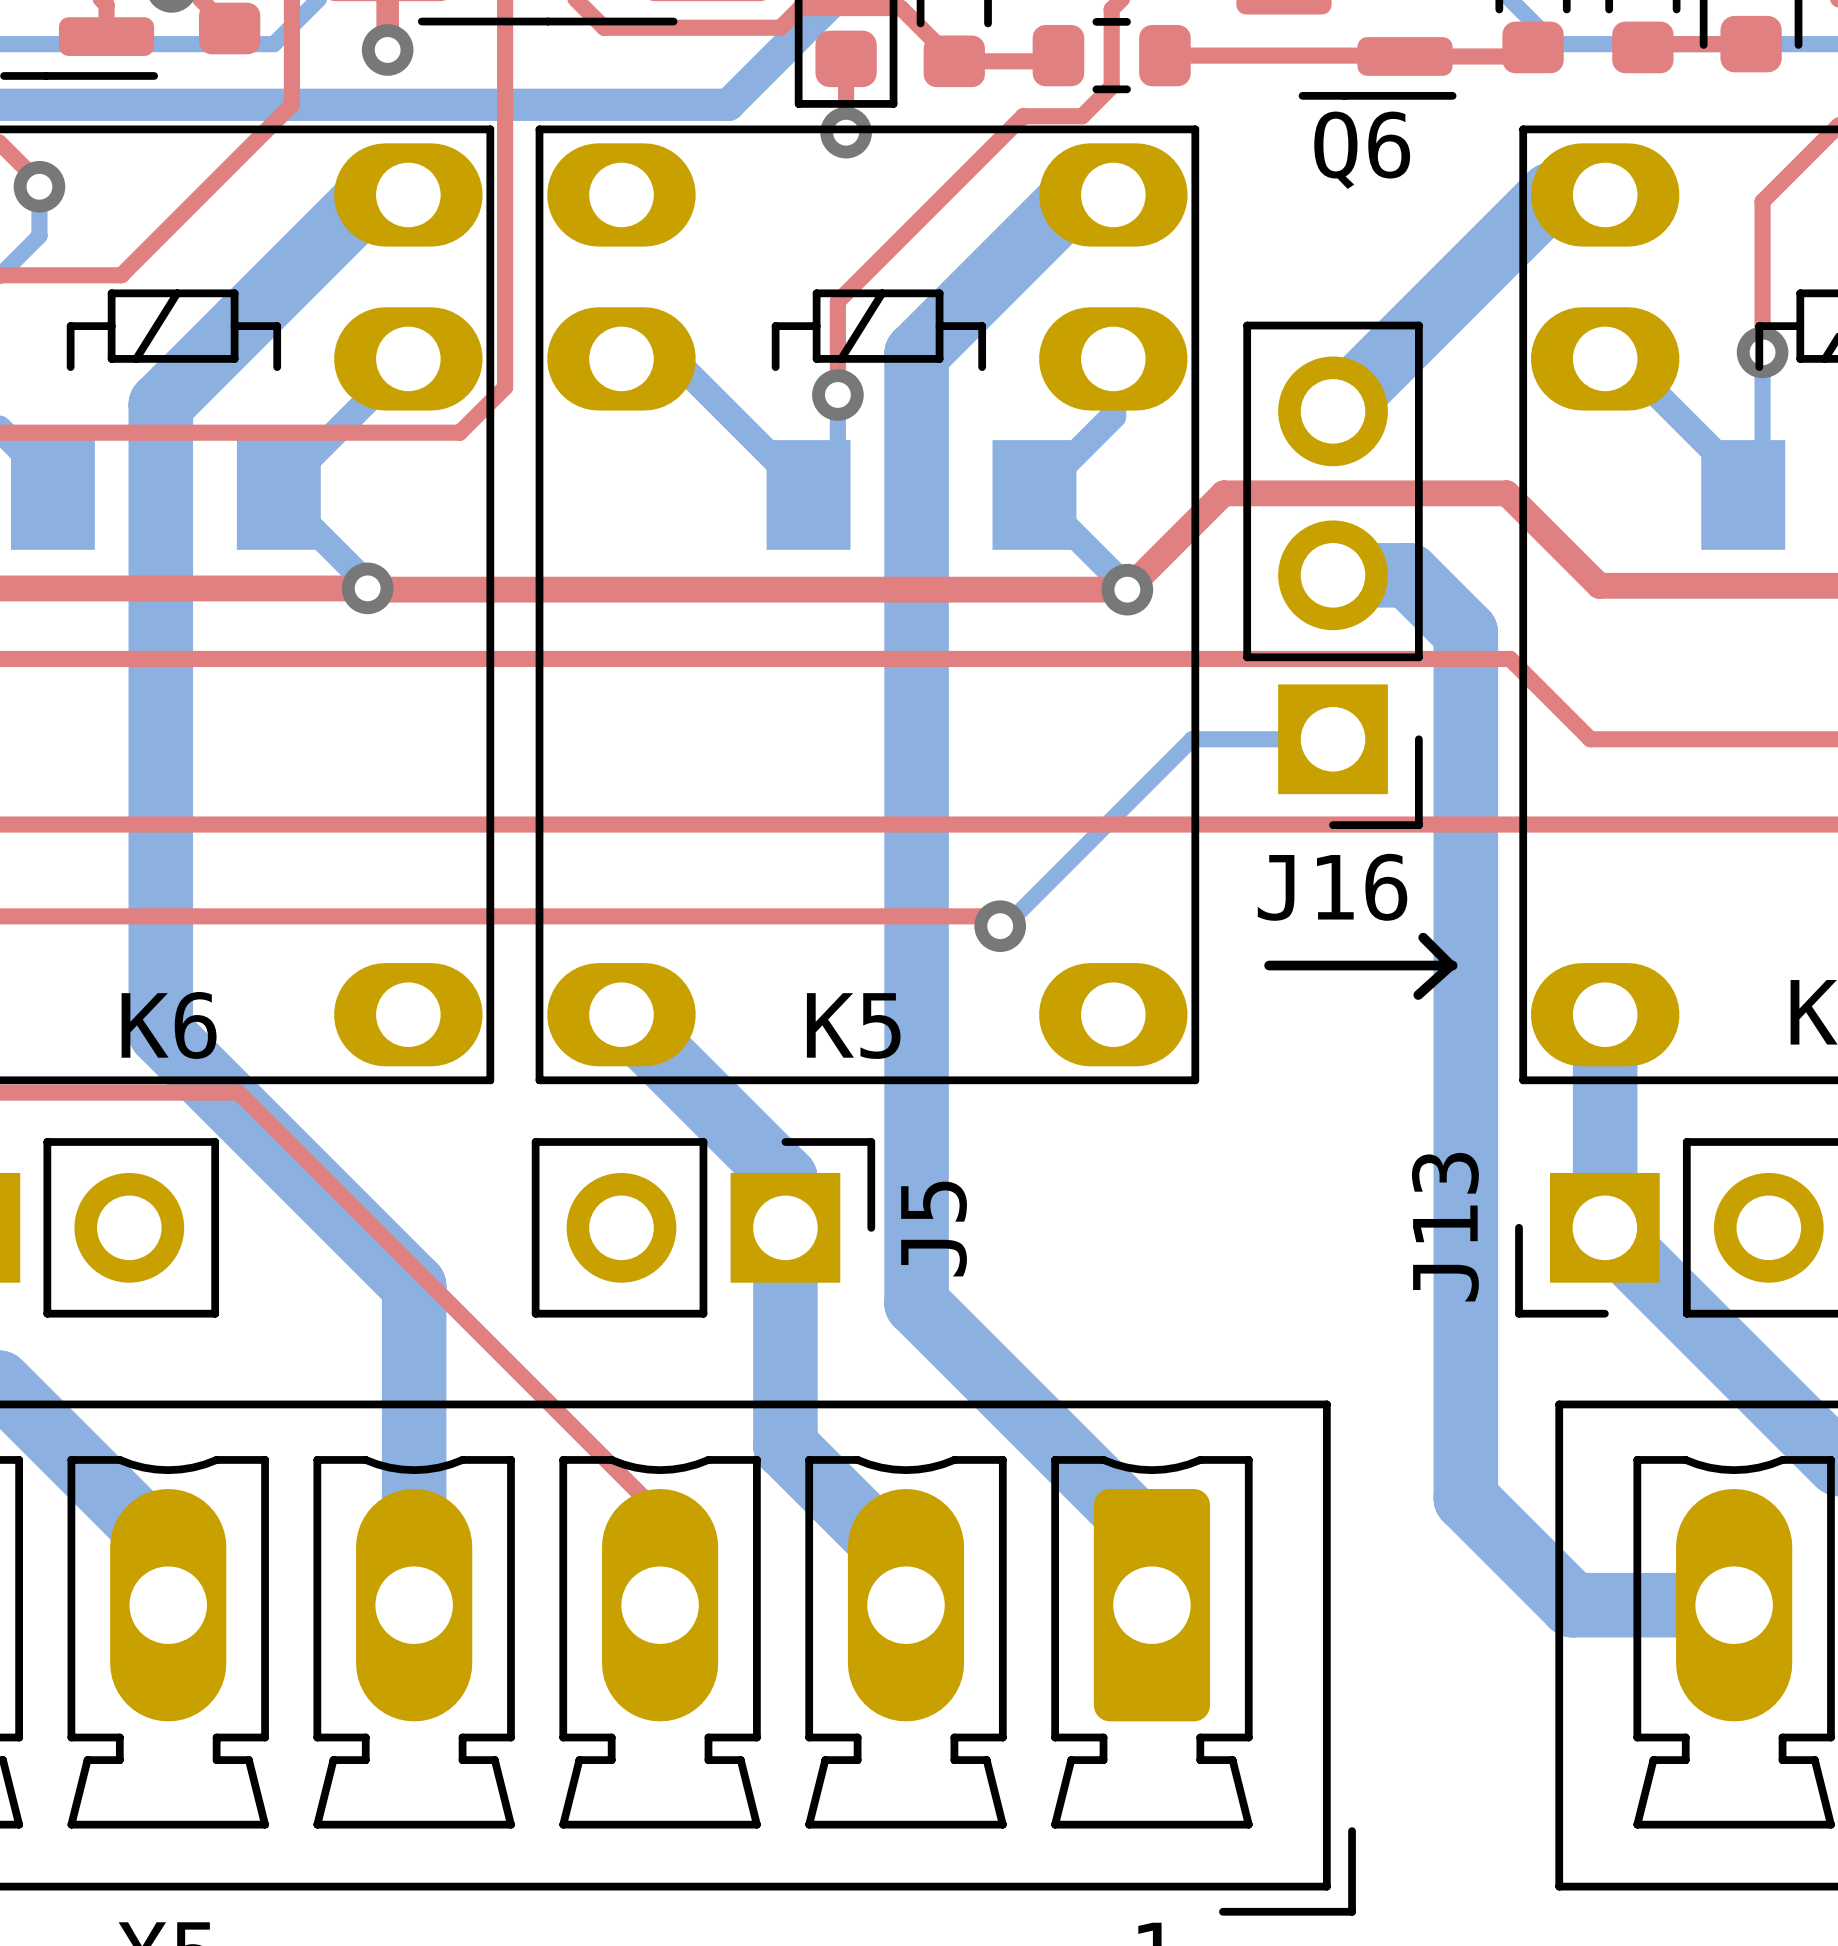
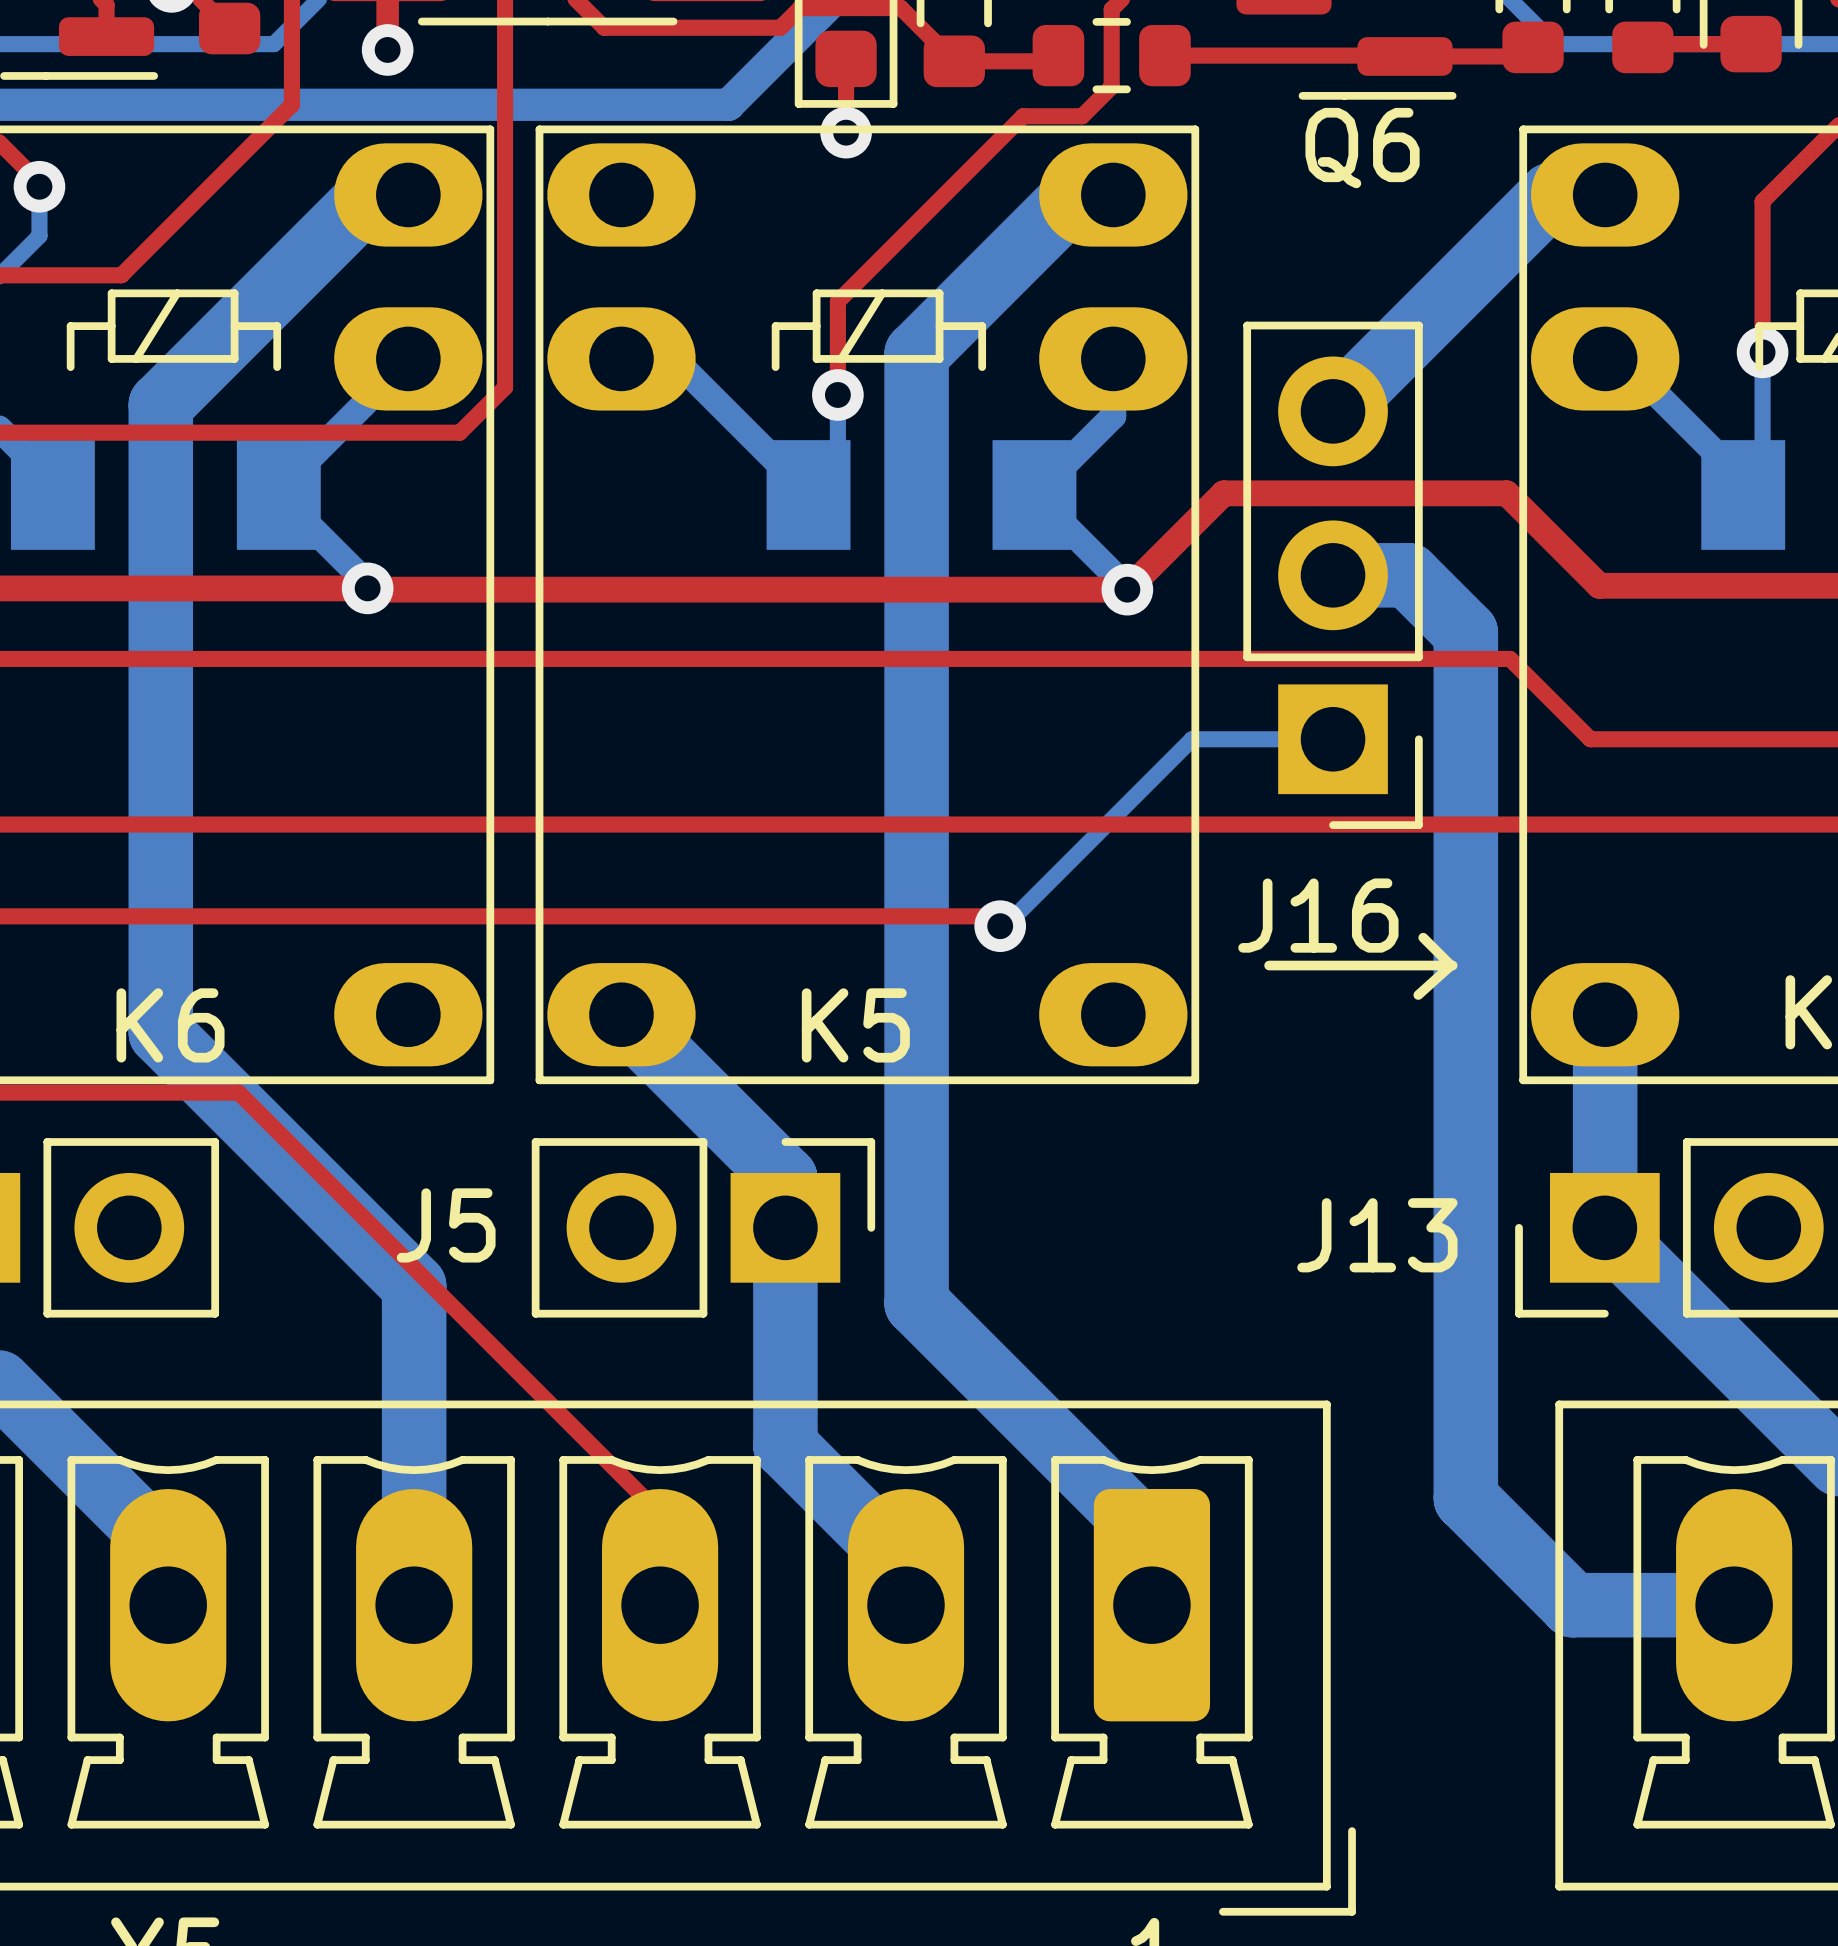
J16 name position: J16 (1332, 887) -> J16 (1318, 915)
J13 name rotation: 0° (1445, 1227) -> 90° clockwise (1377, 1235)
J5 name rotation: 0° (934, 1229) -> 90° clockwise (446, 1225)
J5 name position: J5 (934, 1229) -> J5 (446, 1225)

